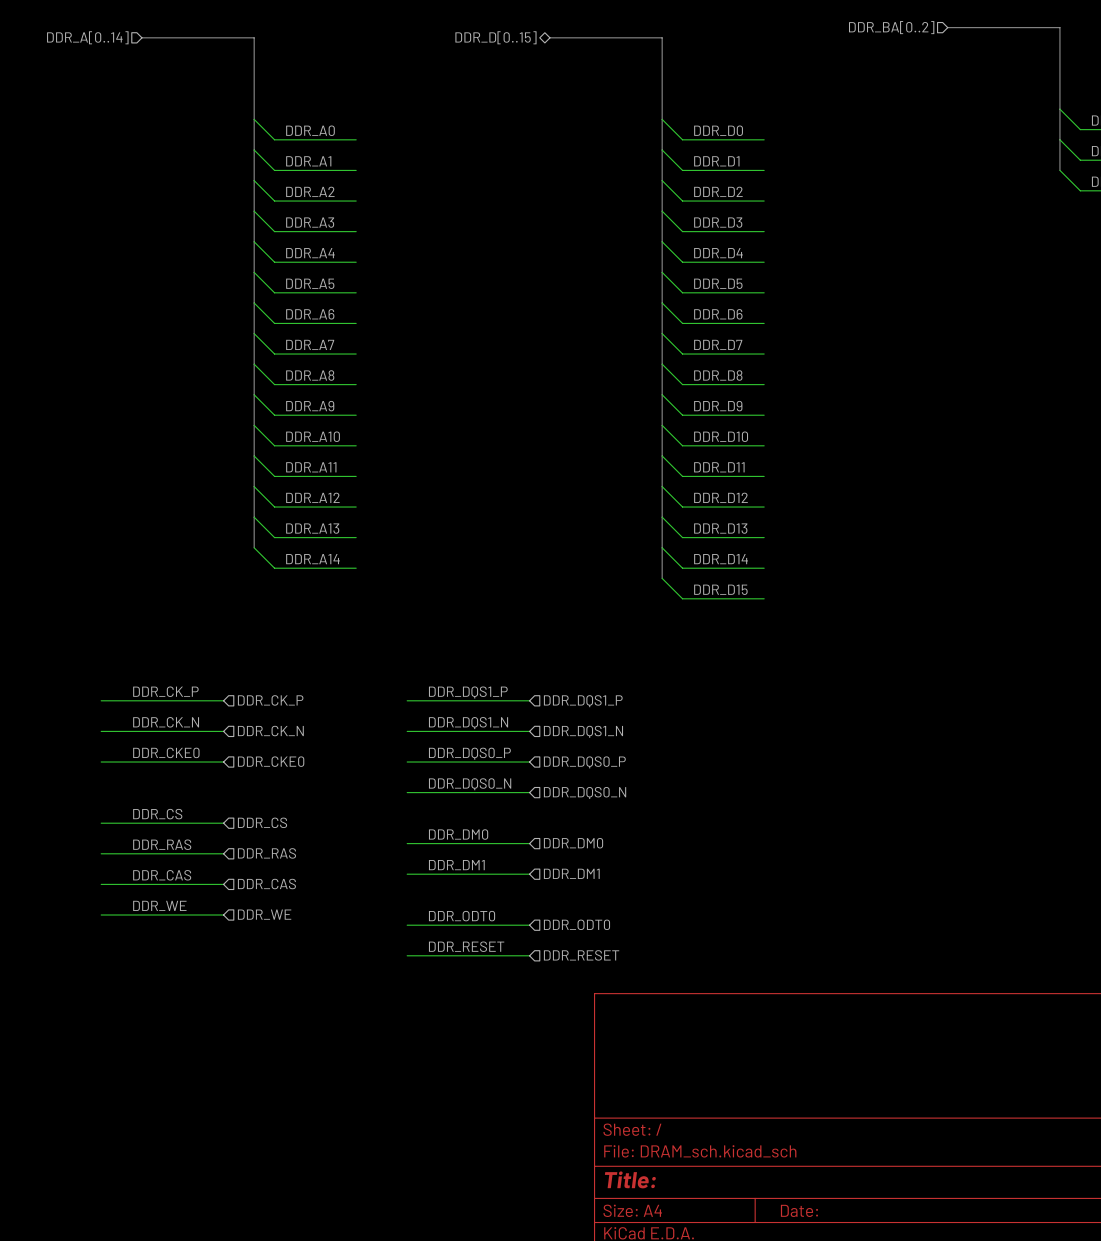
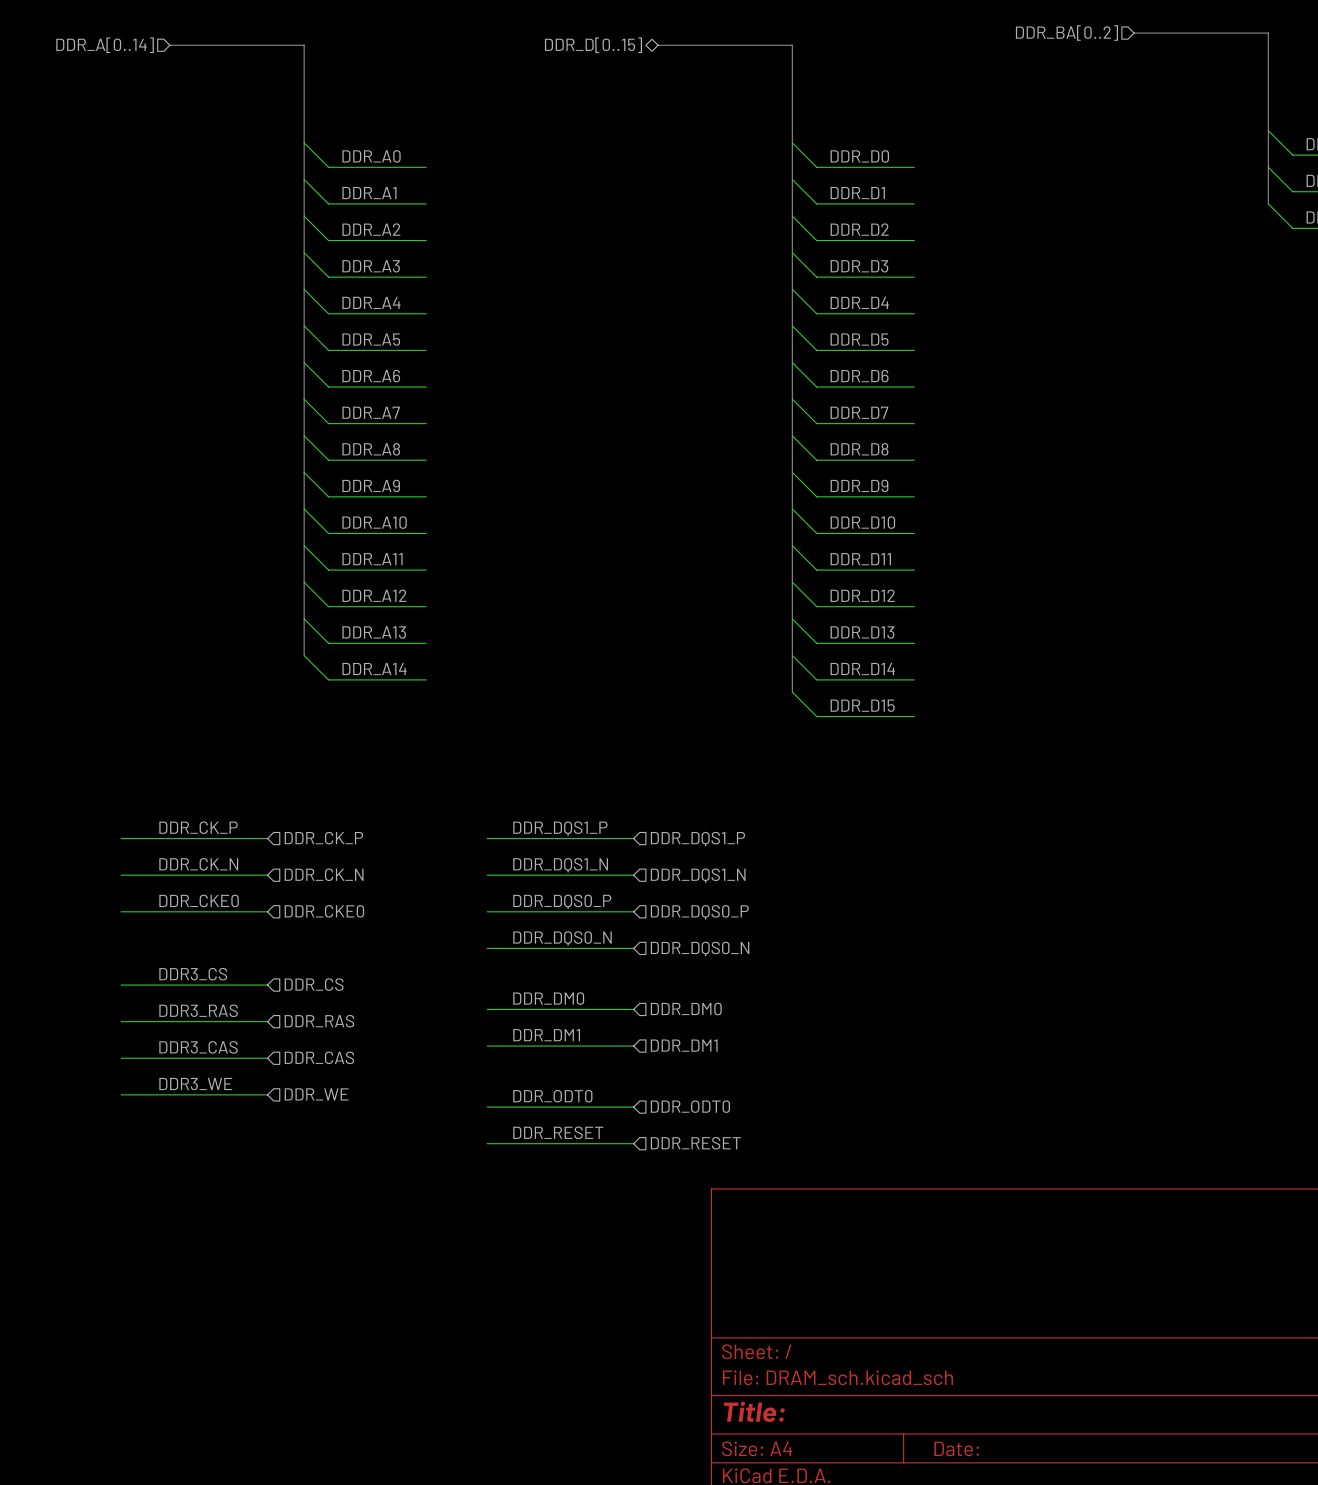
label: DDR_CS (157, 814) -> DDR3_CS (193, 974)
label: DDR_RAS (162, 844) -> DDR3_RAS (198, 1010)
label: DDR_CAS (162, 875) -> DDR3_CAS (198, 1047)
label: DDR_WE (159, 905) -> DDR3_WE (195, 1084)

